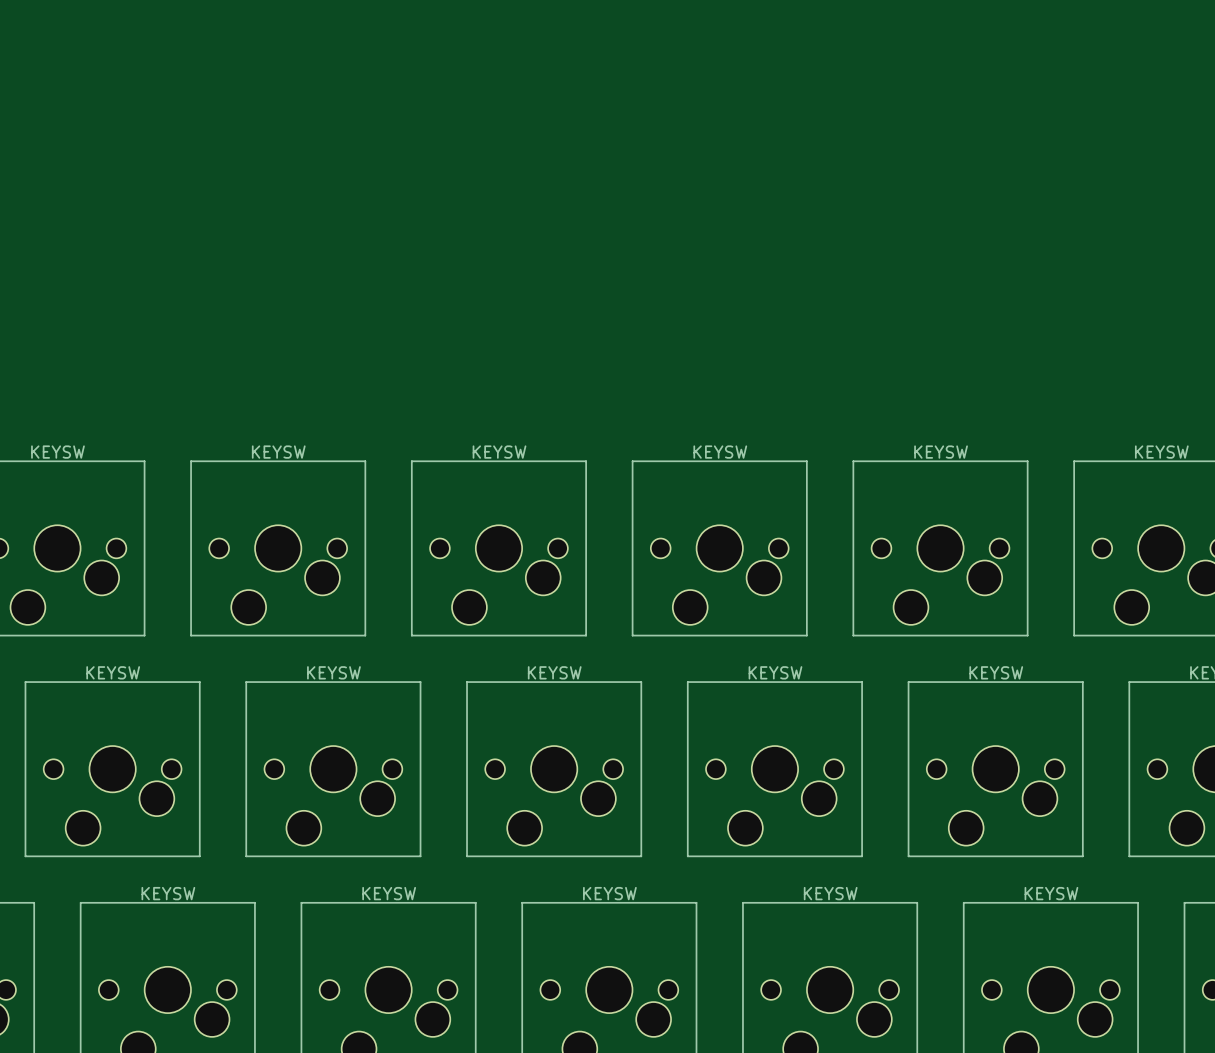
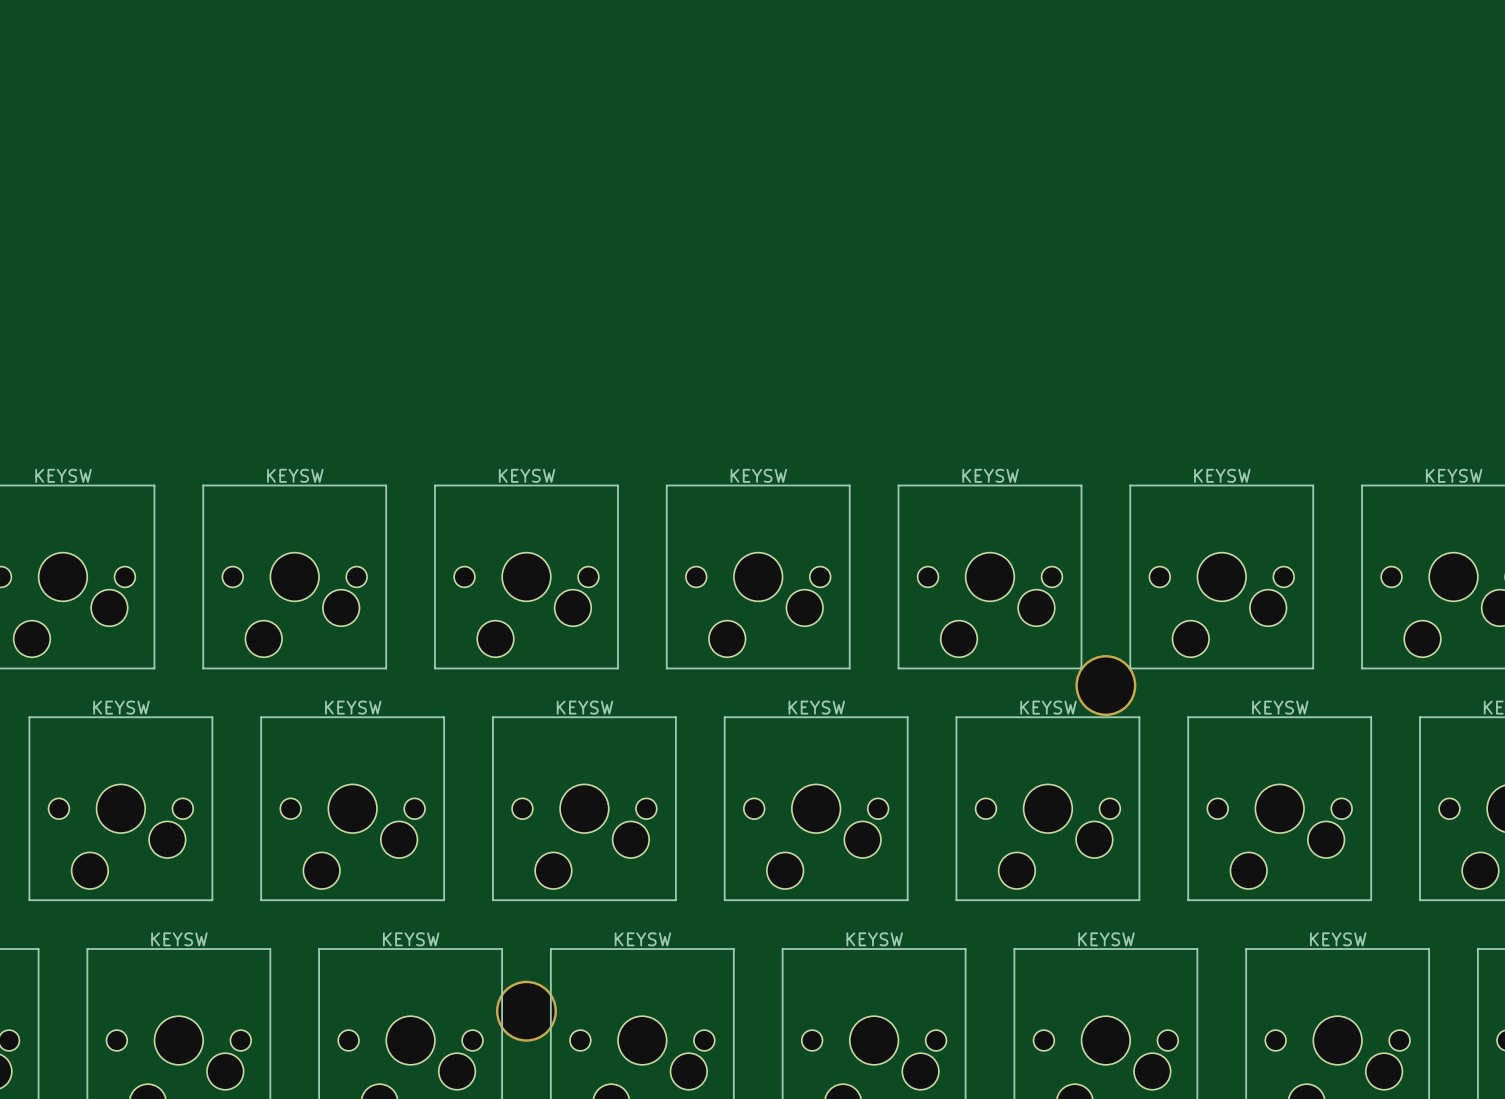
via: none -> (1105, 685)
via: none -> (526, 1011)

